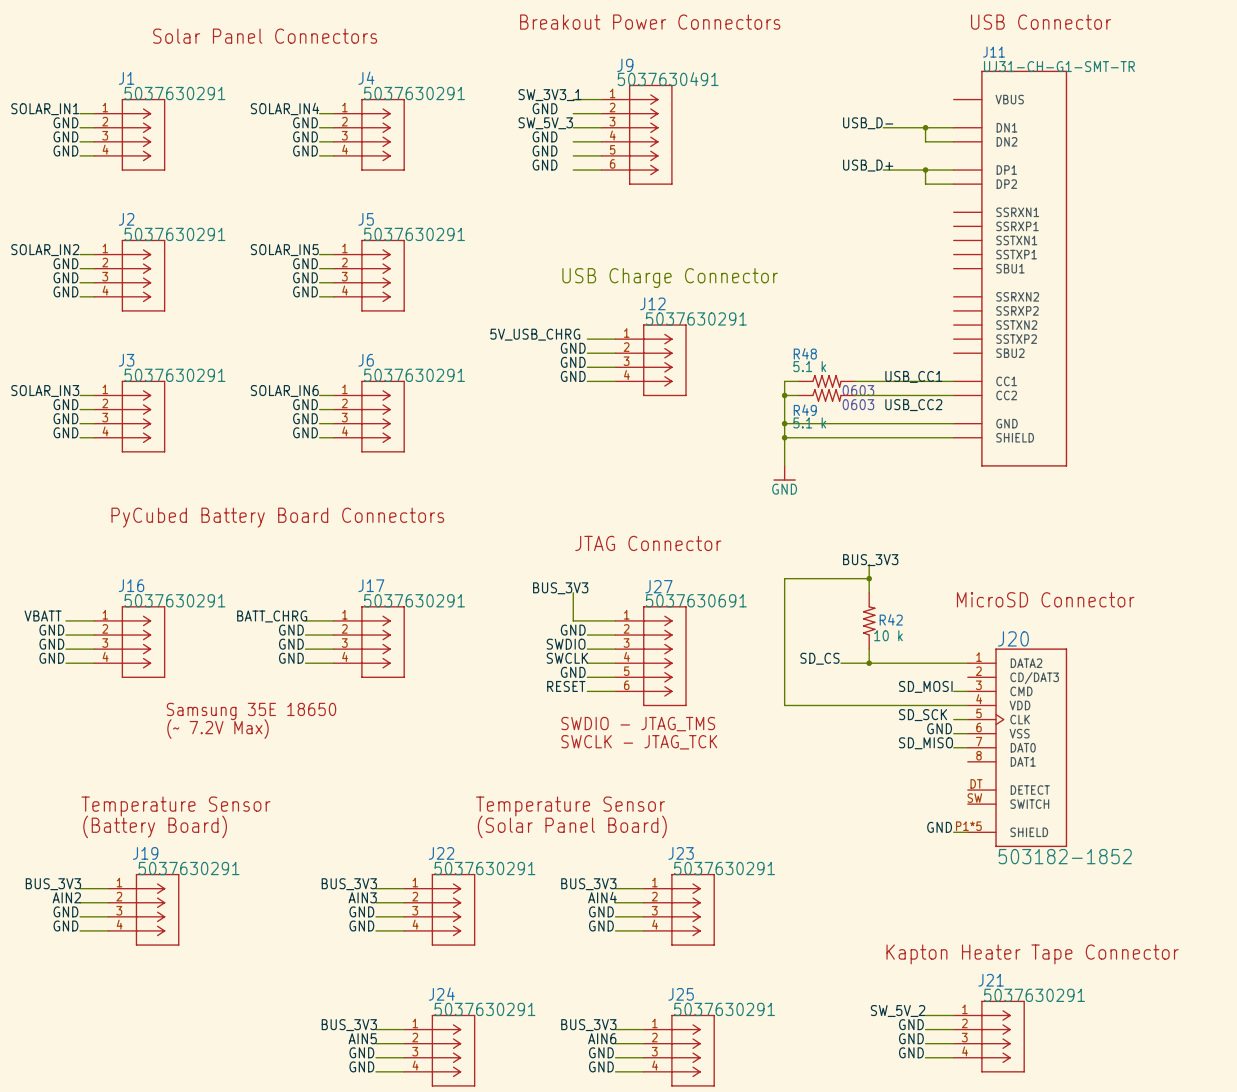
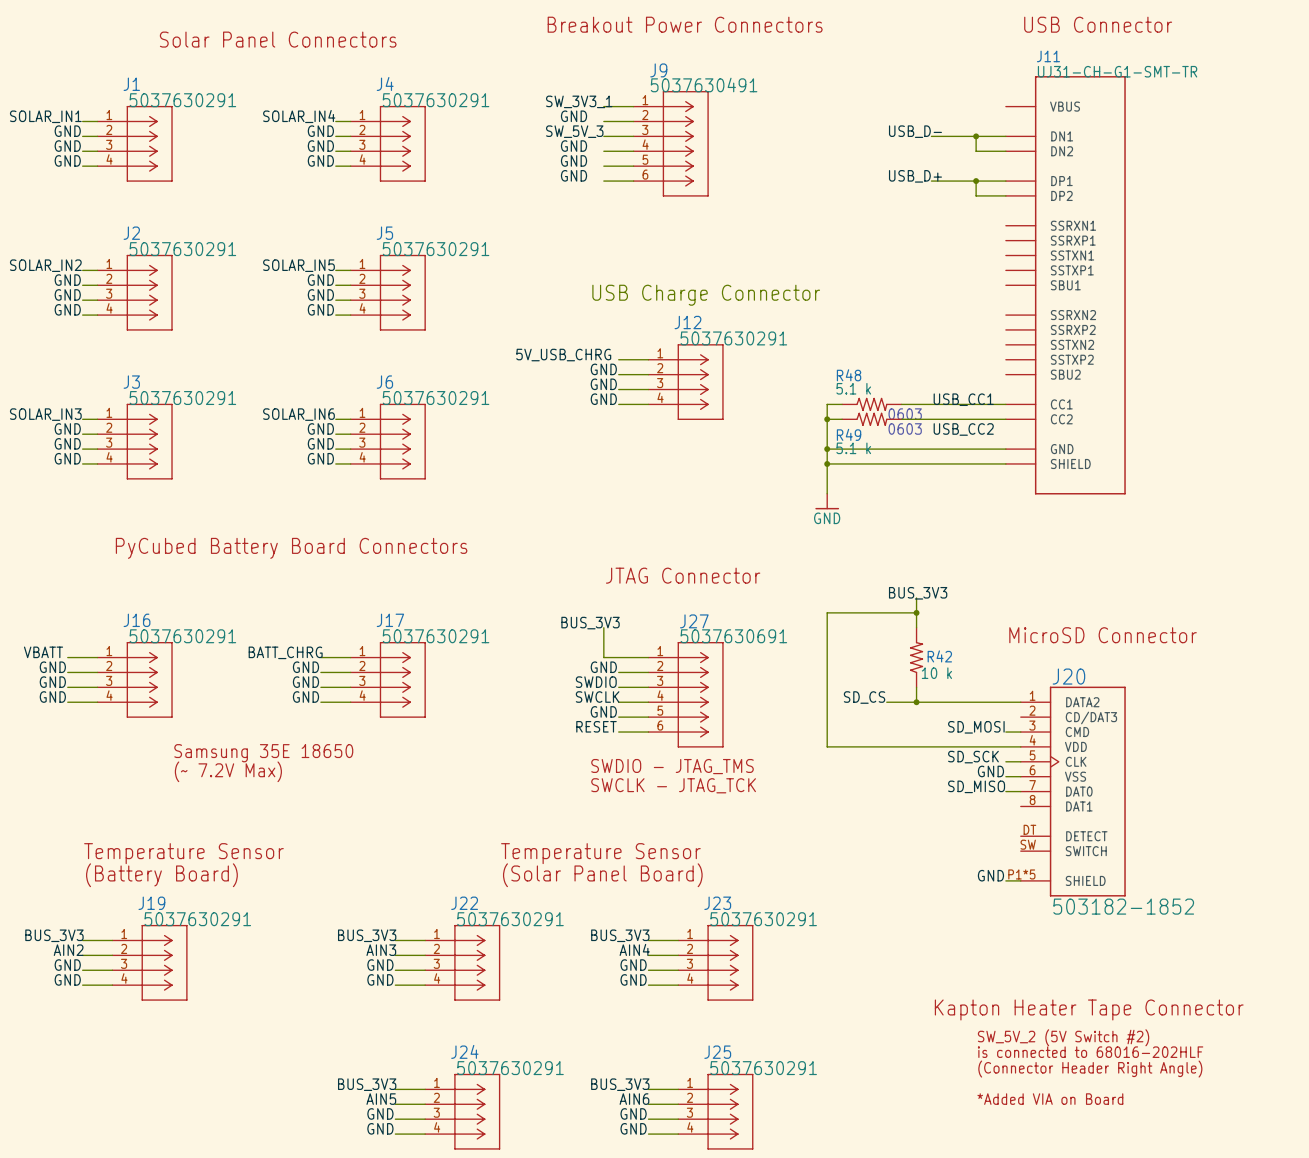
text: none -> SW_5V_2 (5V Switch #2) (1063, 1037)
text: none -> is connected to 68016-202HLF (1090, 1052)
text: none -> (Connector Header Right Angle) (1090, 1069)
label: SW_5V_2 (898, 1011) -> none
wire: (925, 1015) (953, 1015) -> none
label: GND (911, 1024) -> none
wire: (925, 1029) (953, 1029) -> none
J21: 5037630291 (989, 1036) -> none
label: GND (911, 1038) -> none
text: none -> *Added VIA on Board (1050, 1099)
wire: (925, 1043) (953, 1043) -> none
label: GND (911, 1052) -> none
wire: (925, 1057) (953, 1057) -> none

